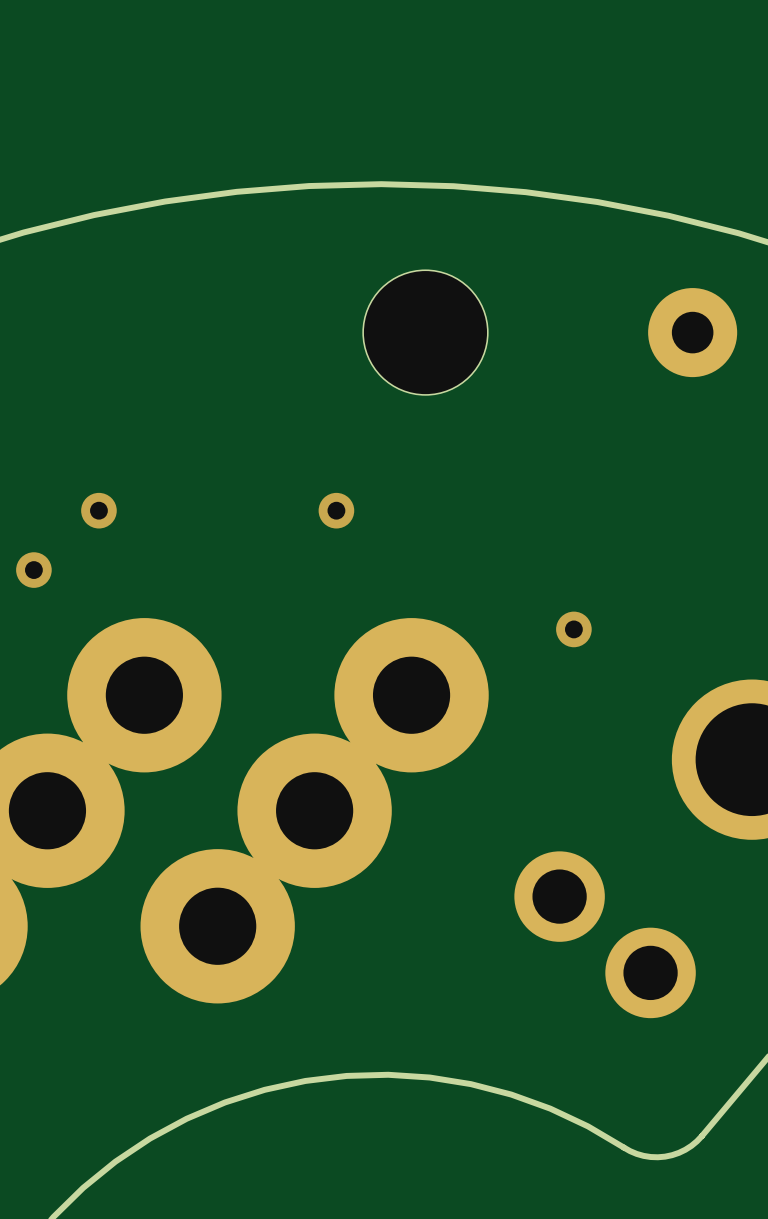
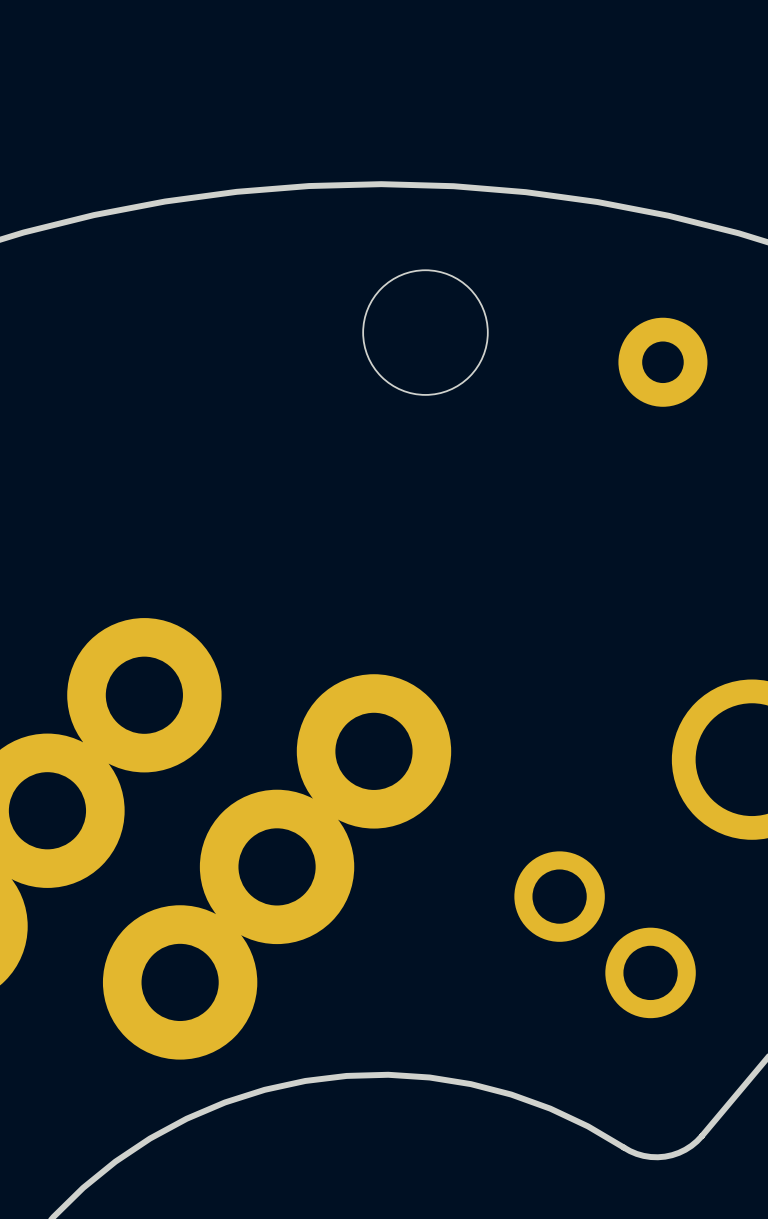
part position: (692, 332) -> (662, 362)
via: (98, 510) -> none
via: (336, 510) -> none
via: (33, 570) -> none
via: (573, 629) -> none
part position: (314, 810) -> (277, 866)

